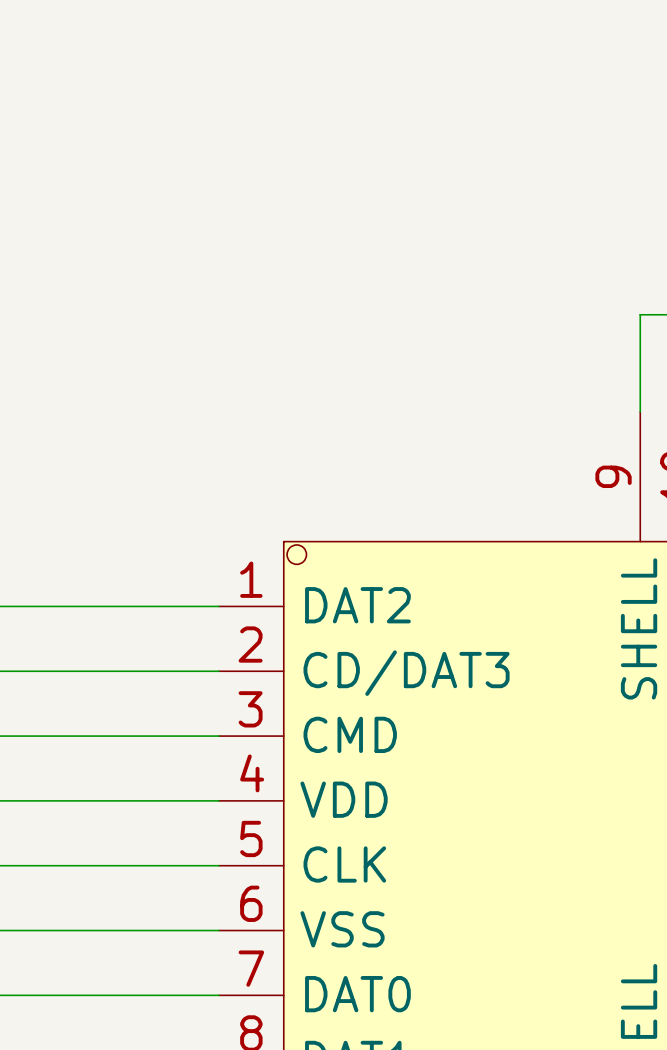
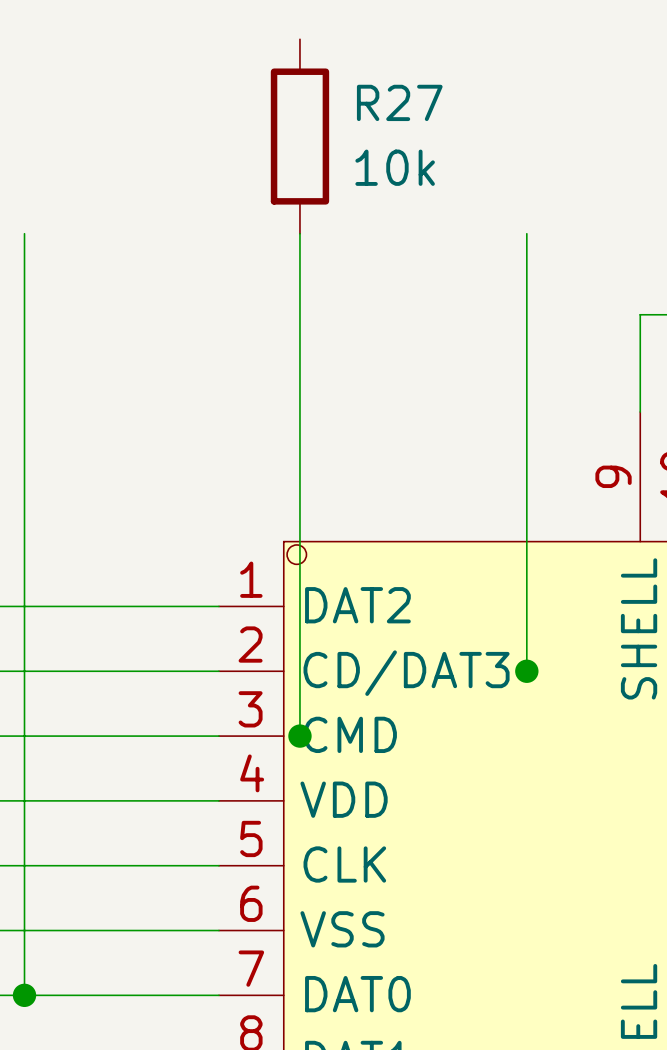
R27: none -> 10k (299, 136)
wire: none -> (24, 233) (24, 995)
wire: none -> (299, 233) (299, 736)
wire: none -> (526, 233) (526, 671)
junction: none -> (526, 671)
junction: none -> (299, 736)
junction: none -> (24, 995)

